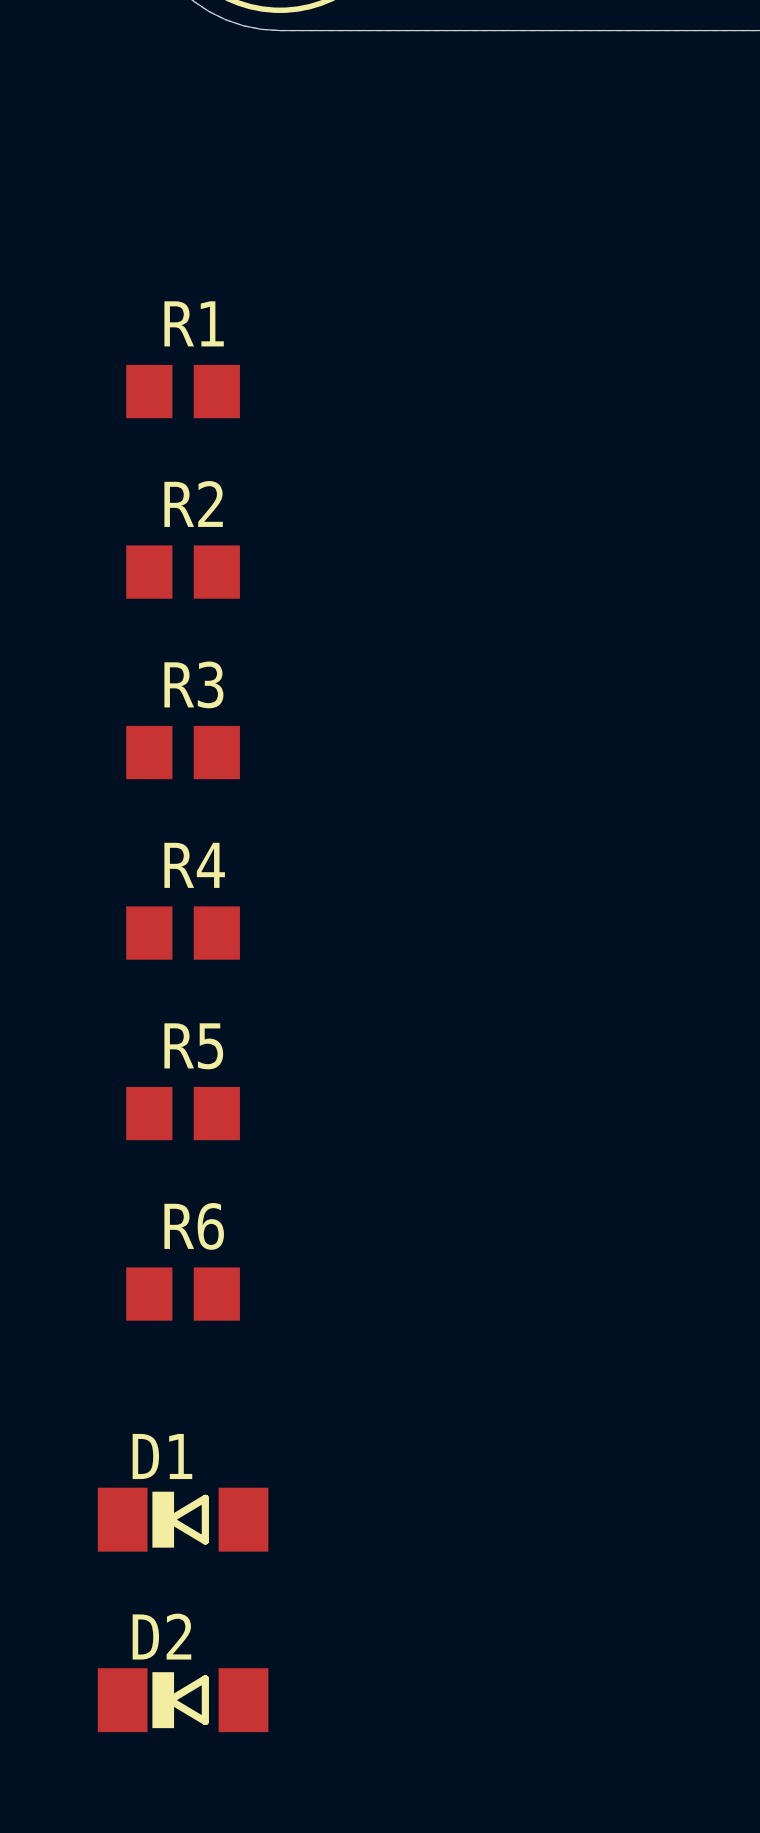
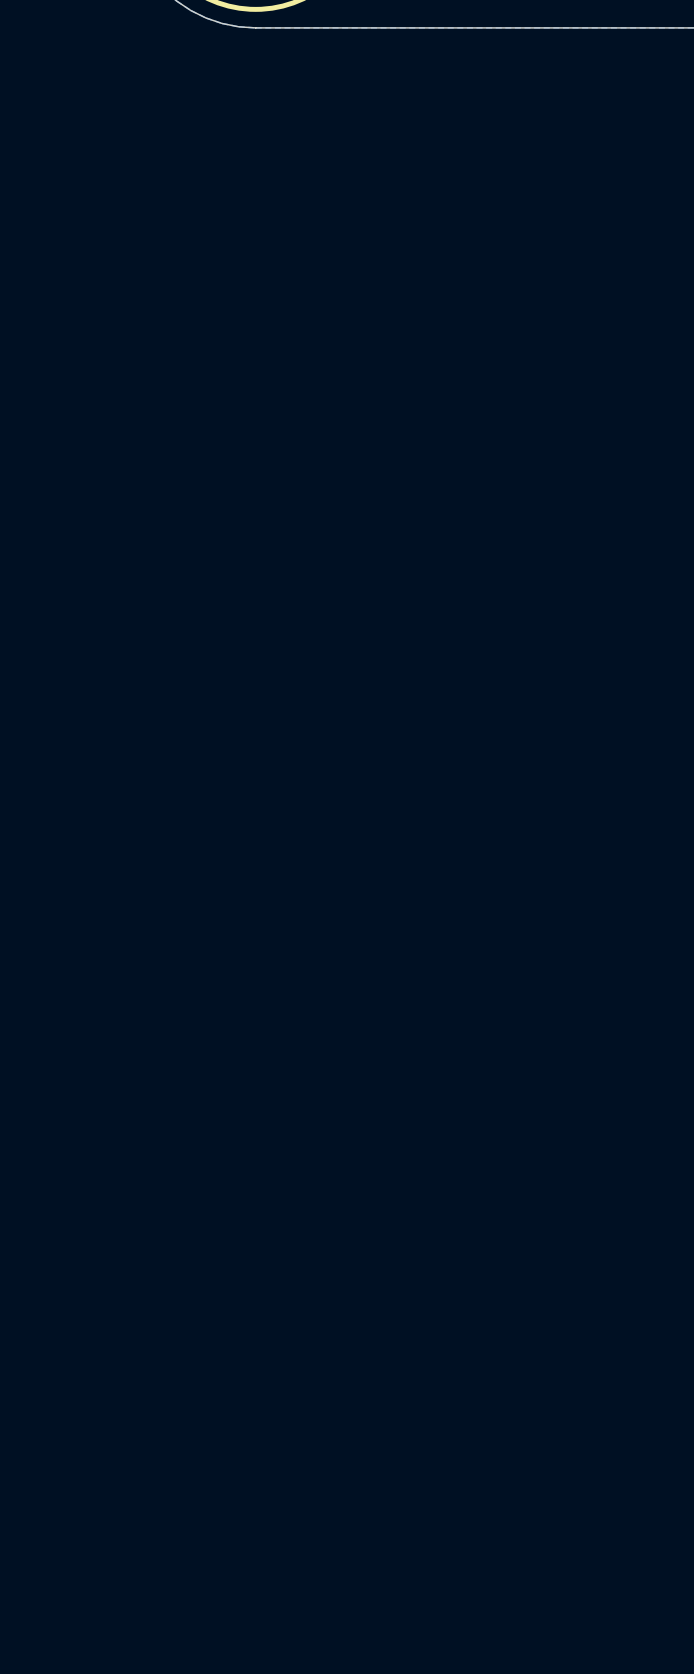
R1: (183, 391) -> none
R2: (183, 572) -> none
R3: (183, 752) -> none
R4: (183, 933) -> none
R5: (183, 1113) -> none
R6: (183, 1294) -> none
D1: (183, 1519) -> none
D2: (183, 1700) -> none

